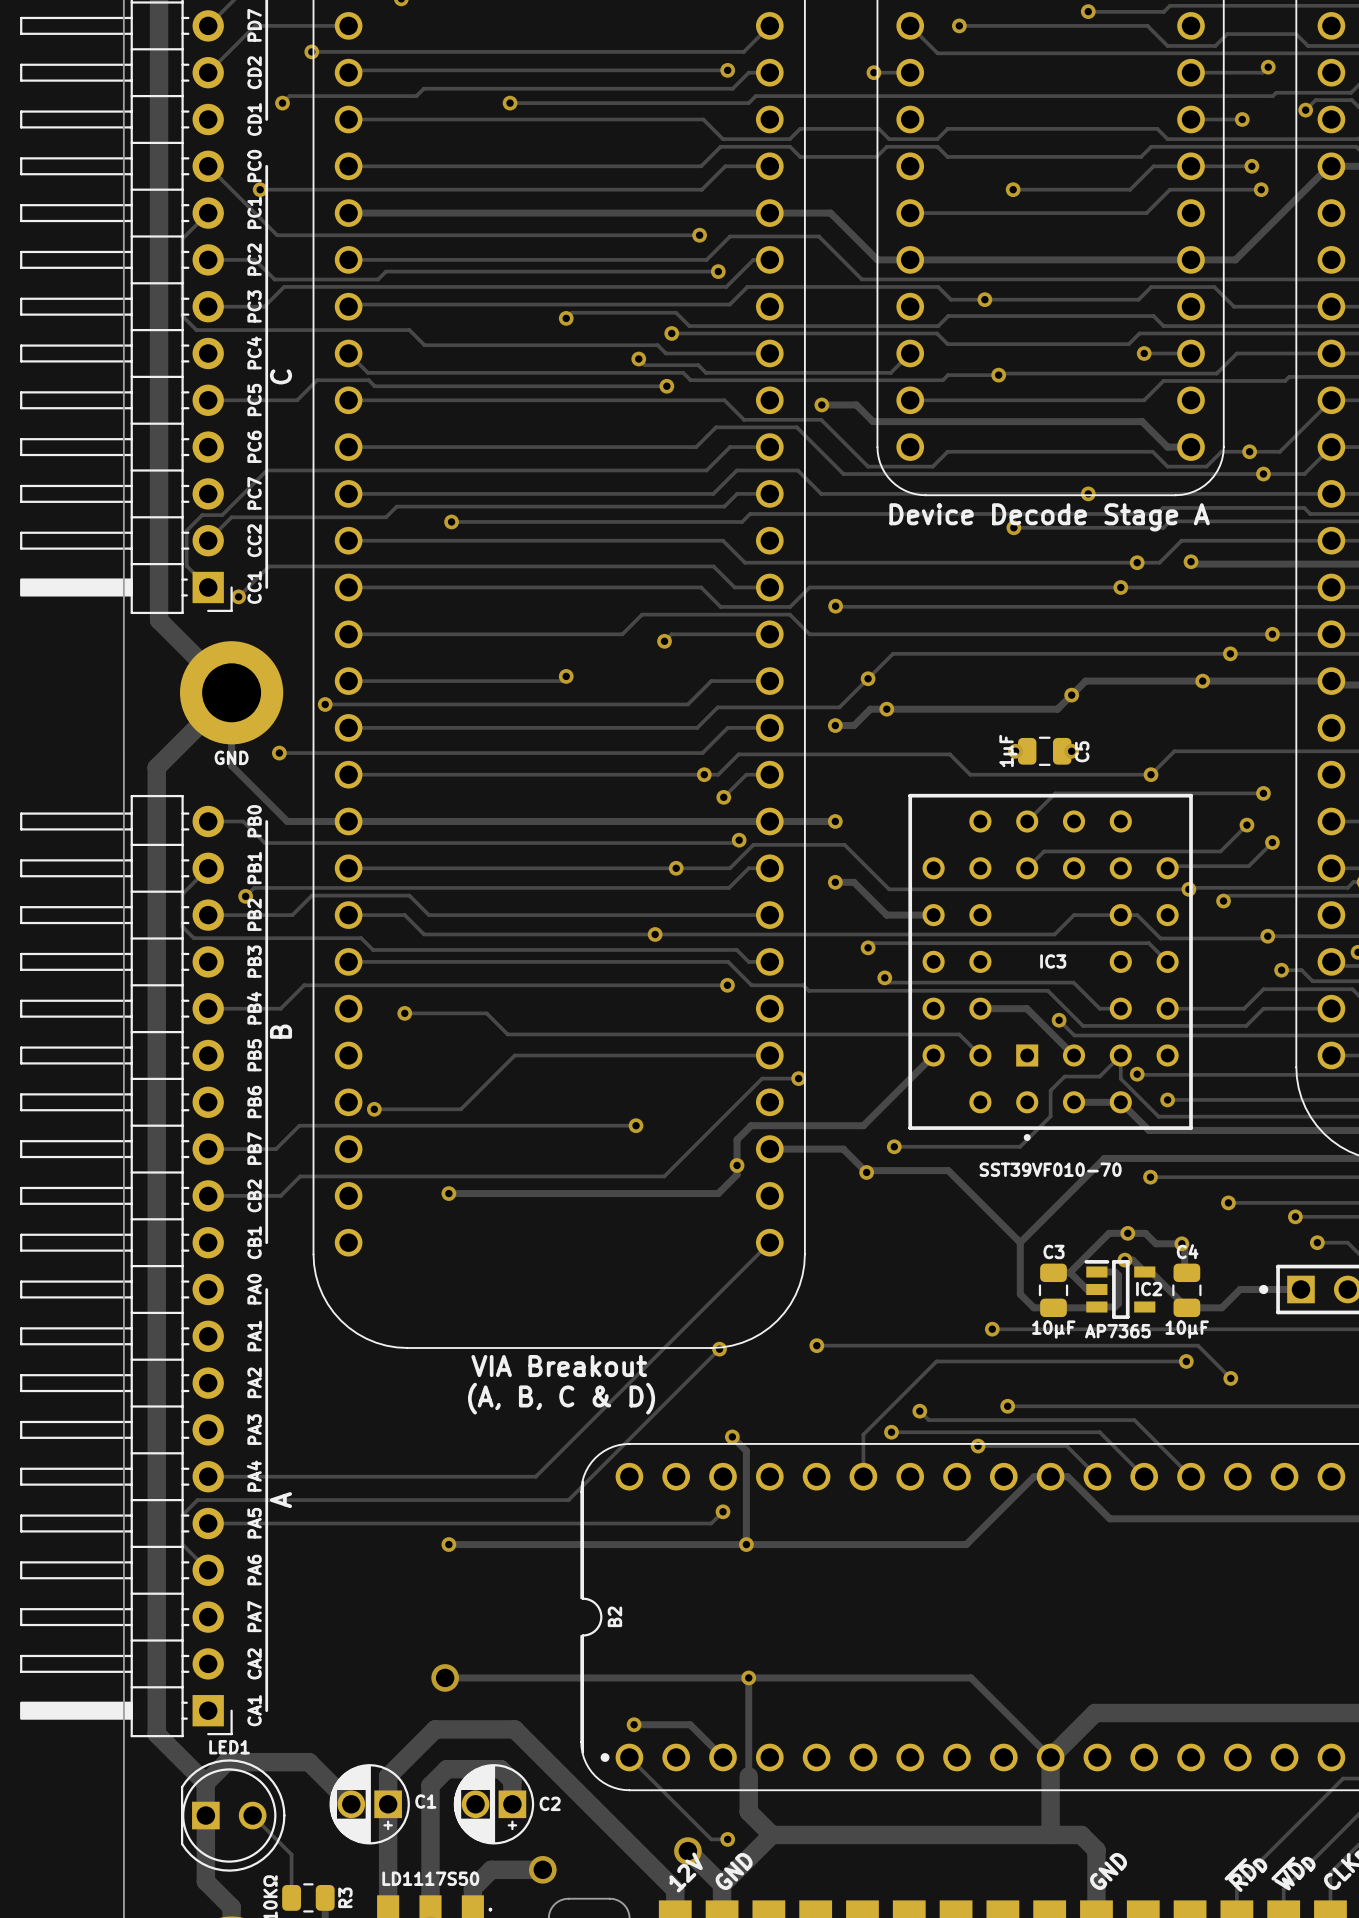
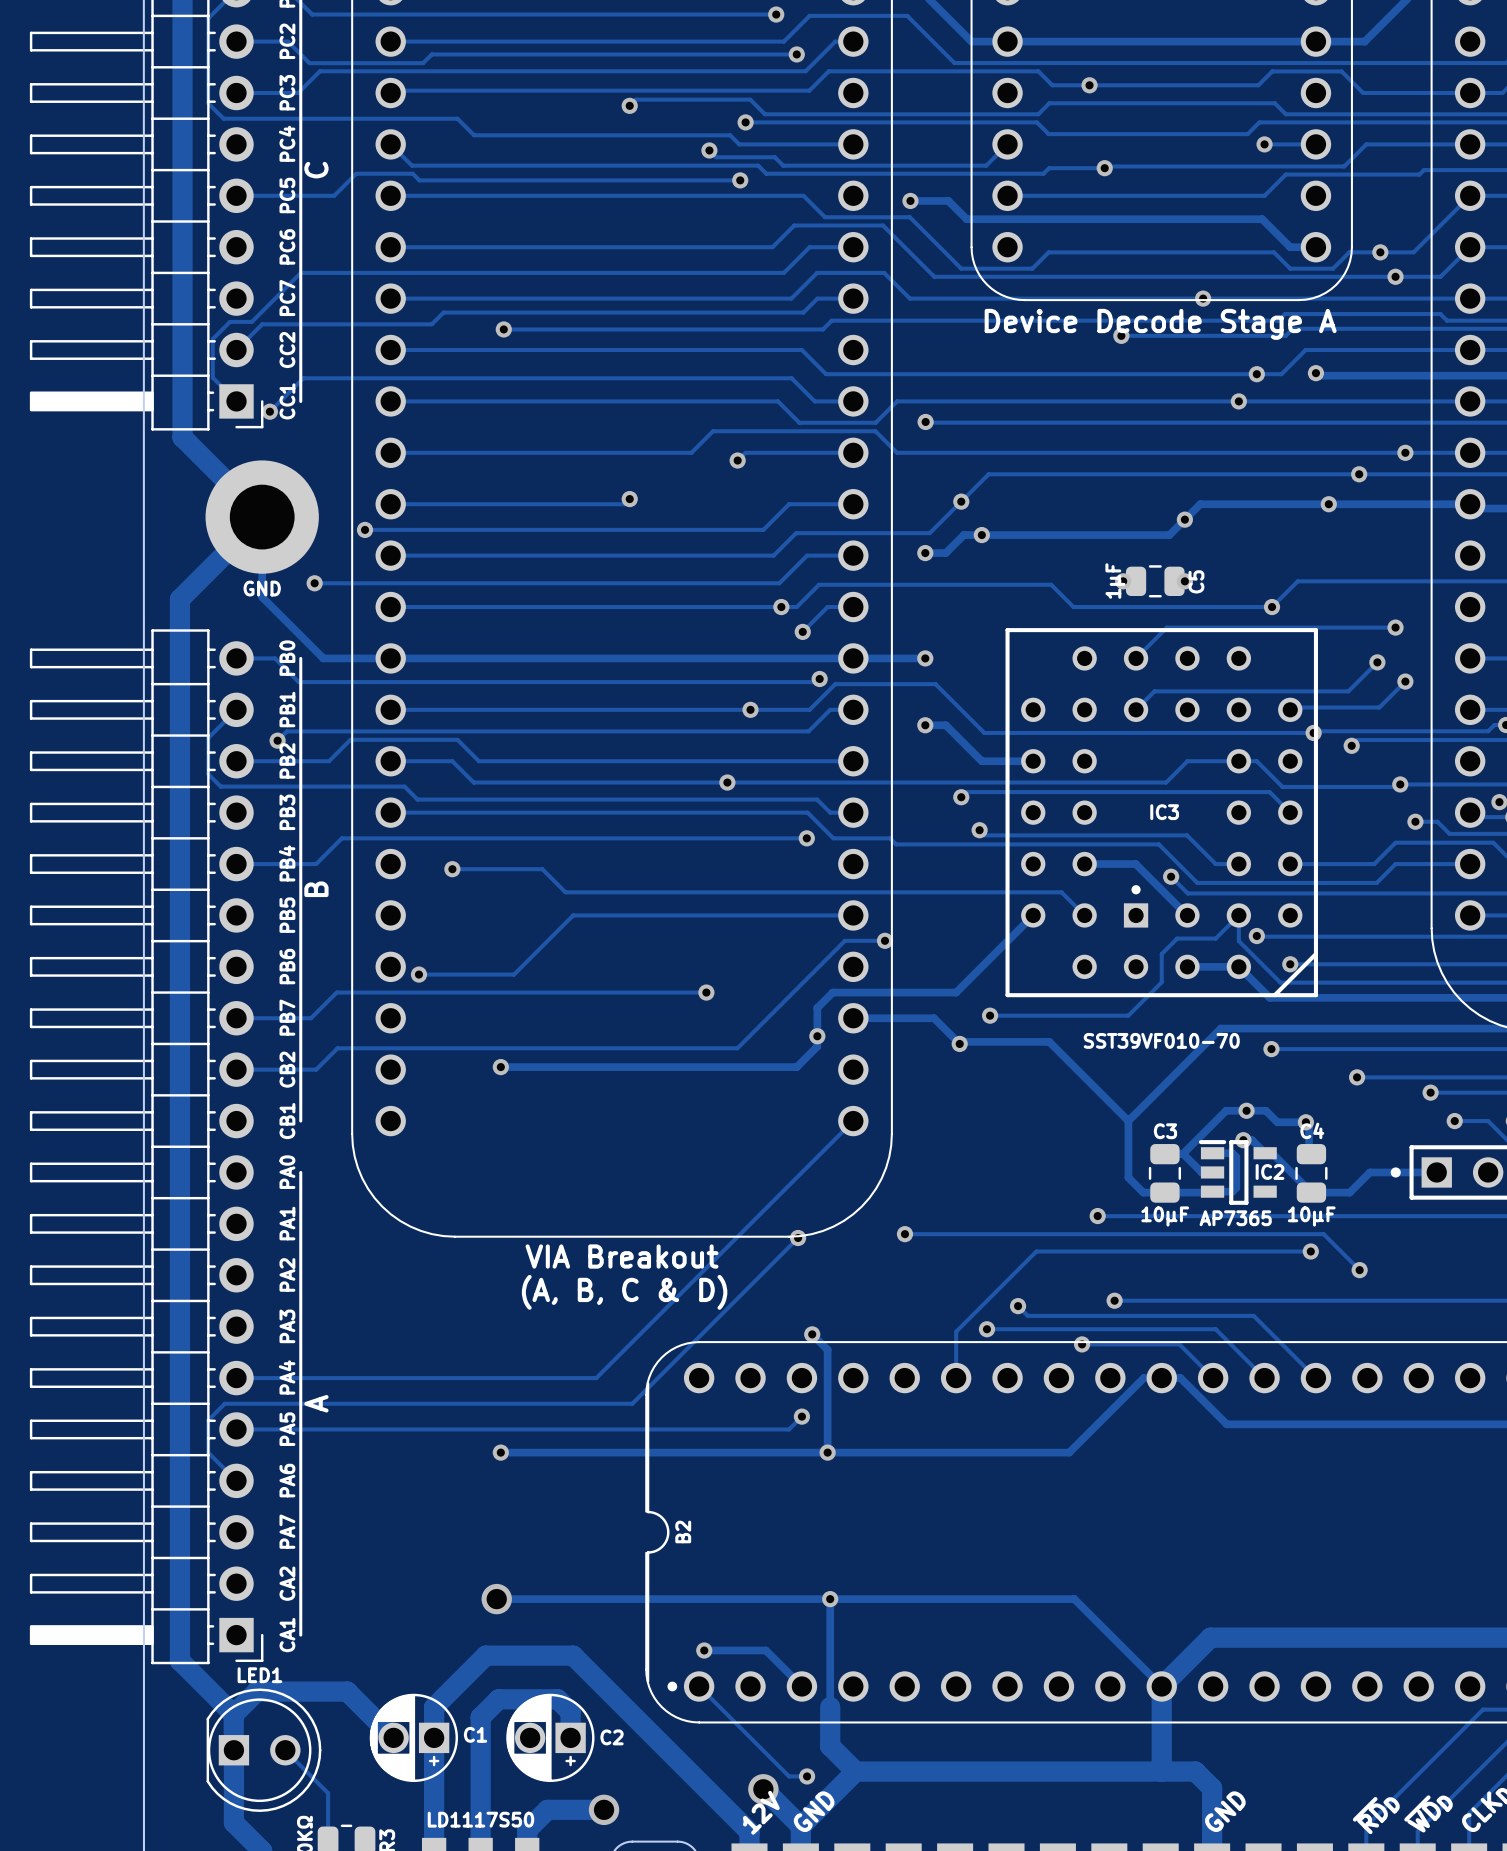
IC3 footprint: [908, 793, 1193, 1141] -> [1005, 628, 1318, 998]

